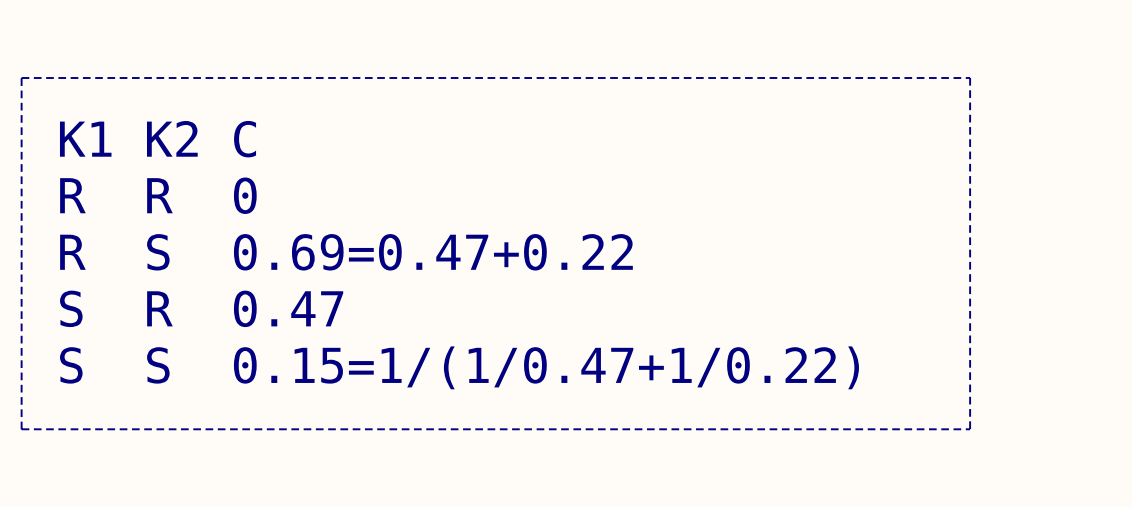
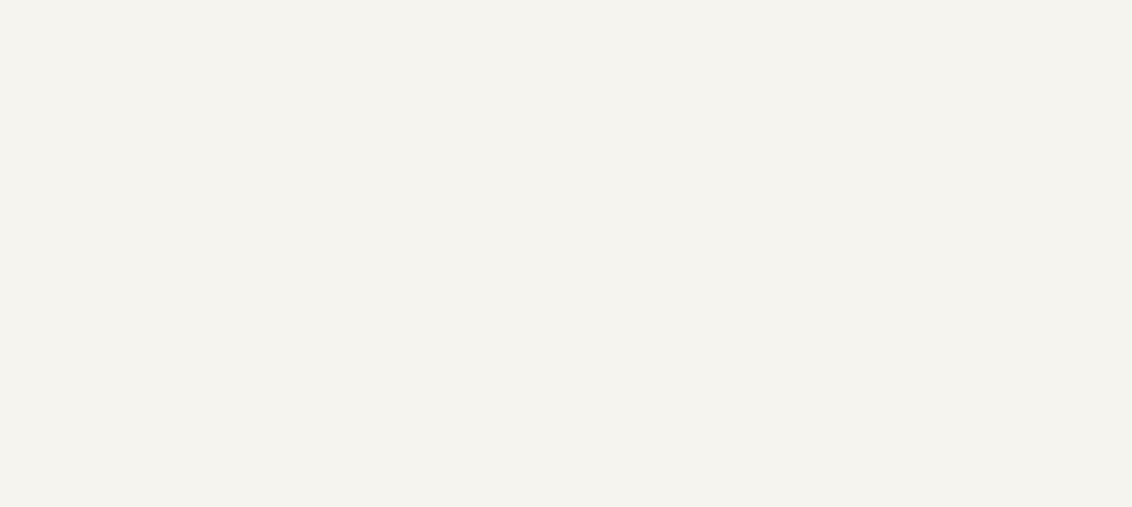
line: (21, 78) (970, 78) (970, 429) (21, 429) (21, 78) -> none
text: K1 K2 C (158, 139) -> none
text: R R 0 (158, 195) -> none
text: R S 0.69=0.47+0.22 (346, 252) -> none
text: S R 0.47 (201, 308) -> none
text: S S 0.15=1/(1/0.47+1/0.22) (459, 367) -> none

